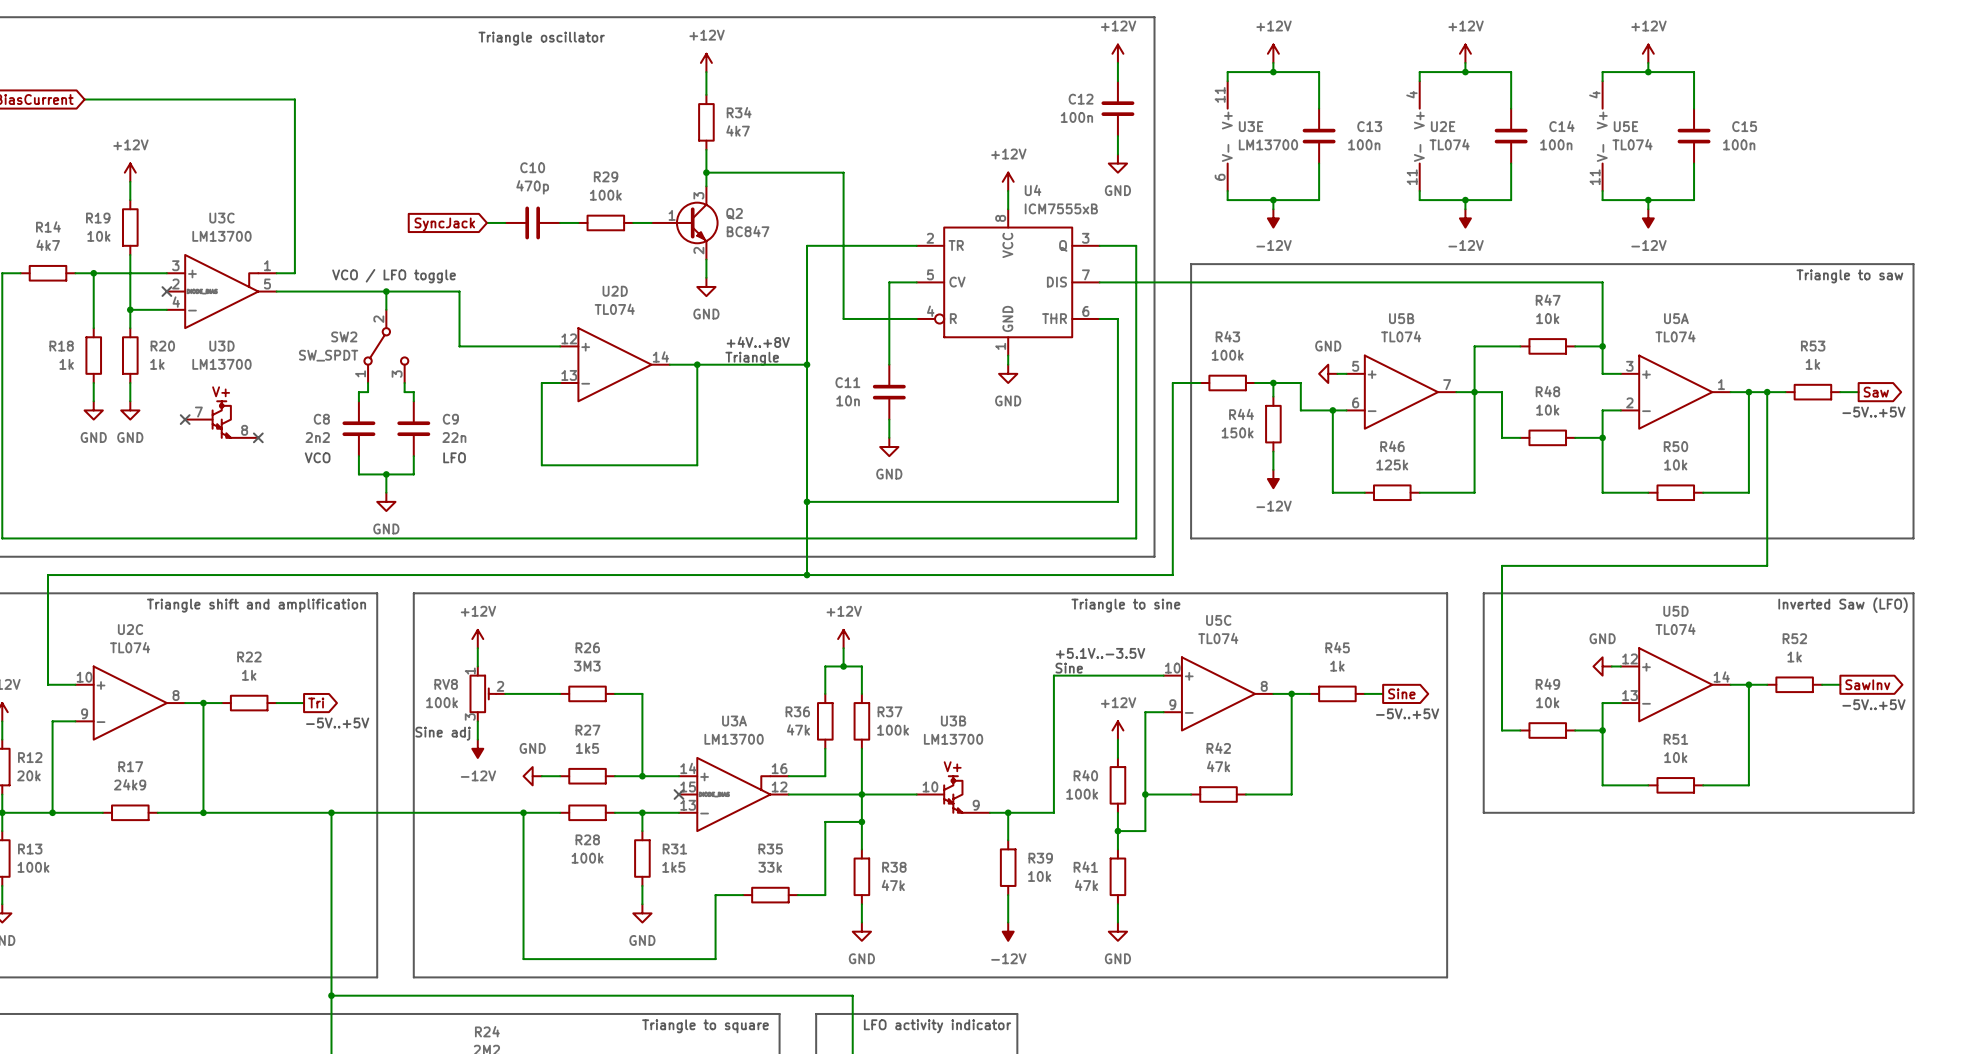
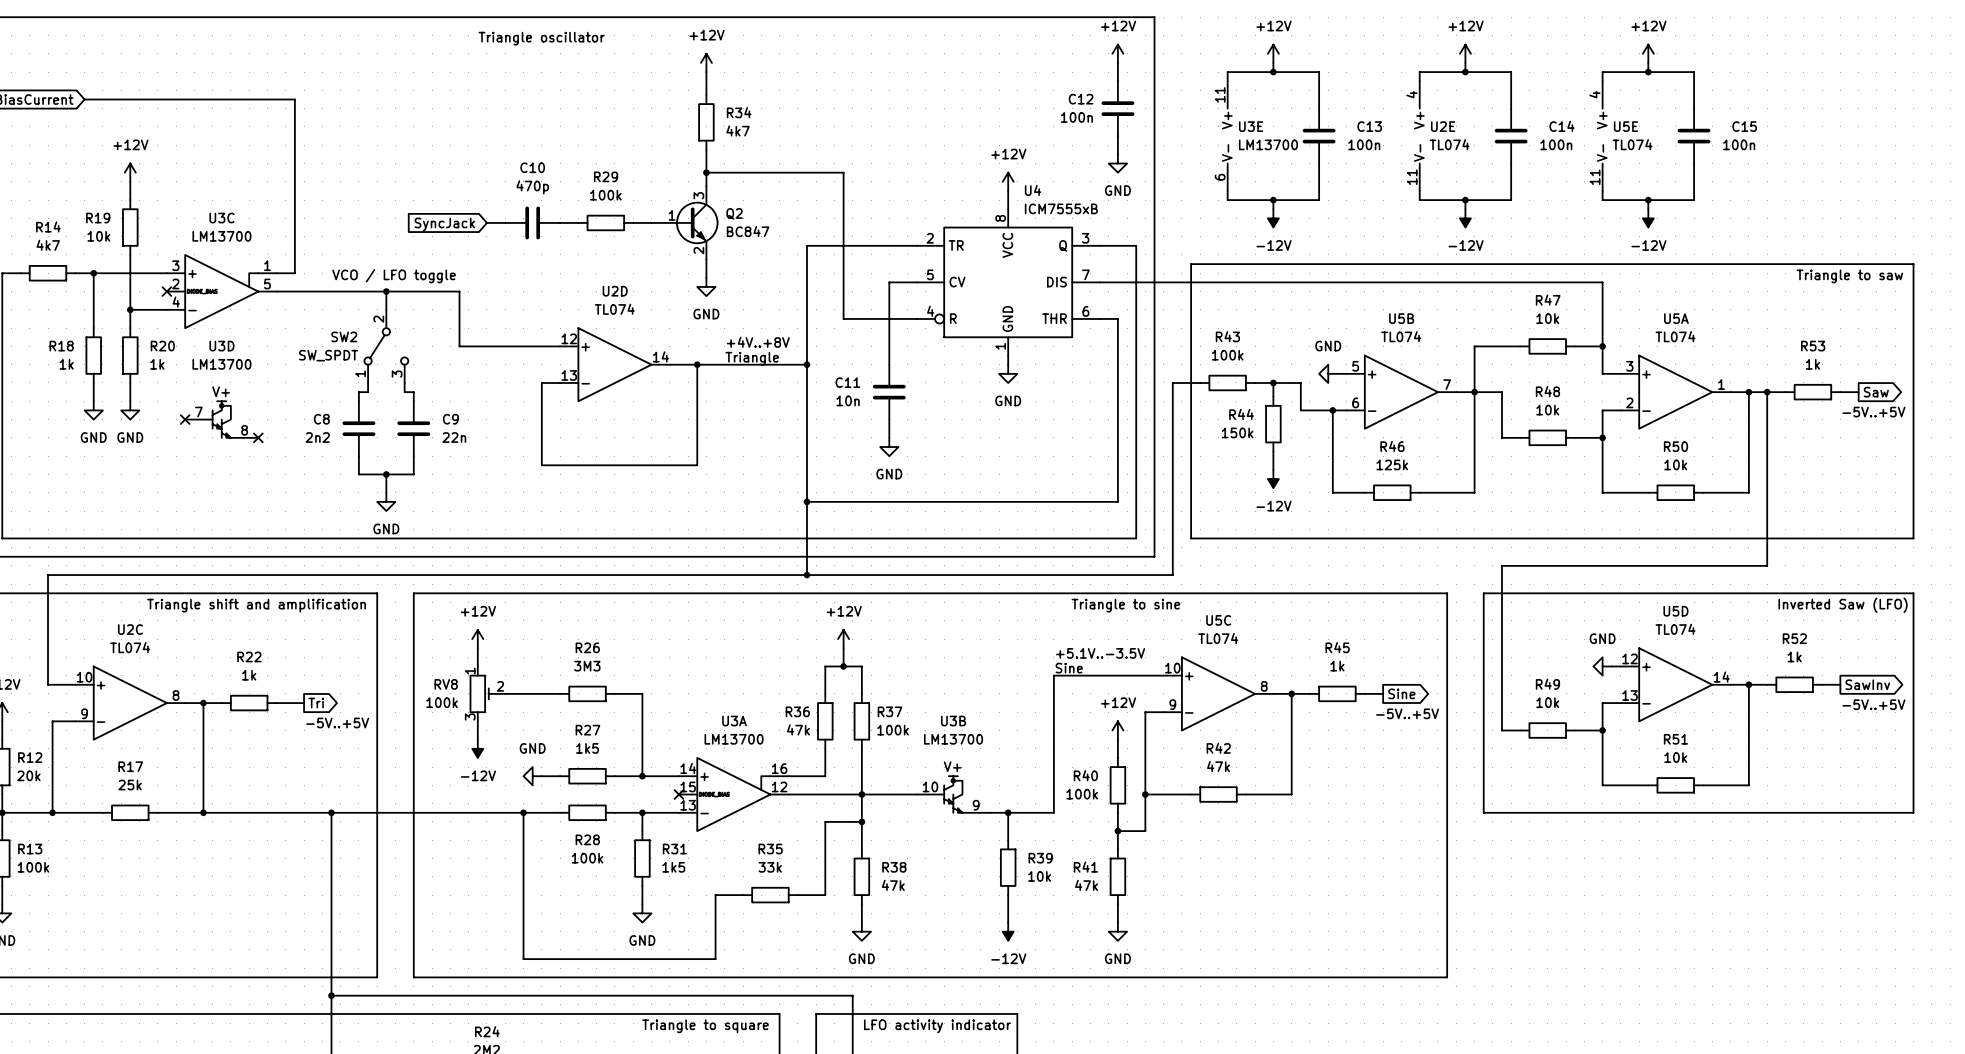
text: VCO (317, 457) -> none
text: LFO (454, 457) -> none
text: Sine adj (443, 733) -> none
R17 value: 24k9 (130, 784) -> 25k (130, 785)

